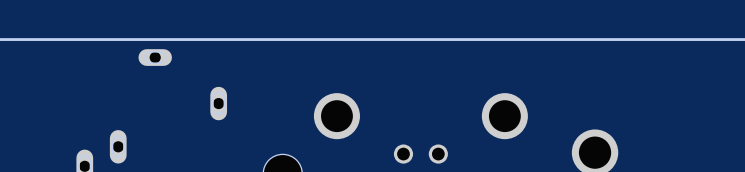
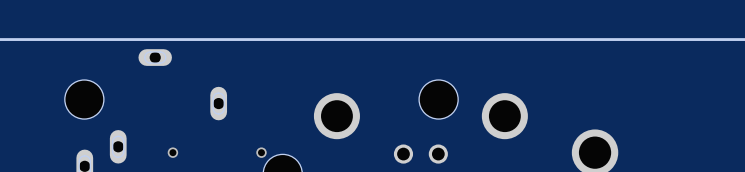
part: none -> (84, 99)
part: none -> (438, 99)
via: none -> (172, 152)
via: none -> (261, 152)

